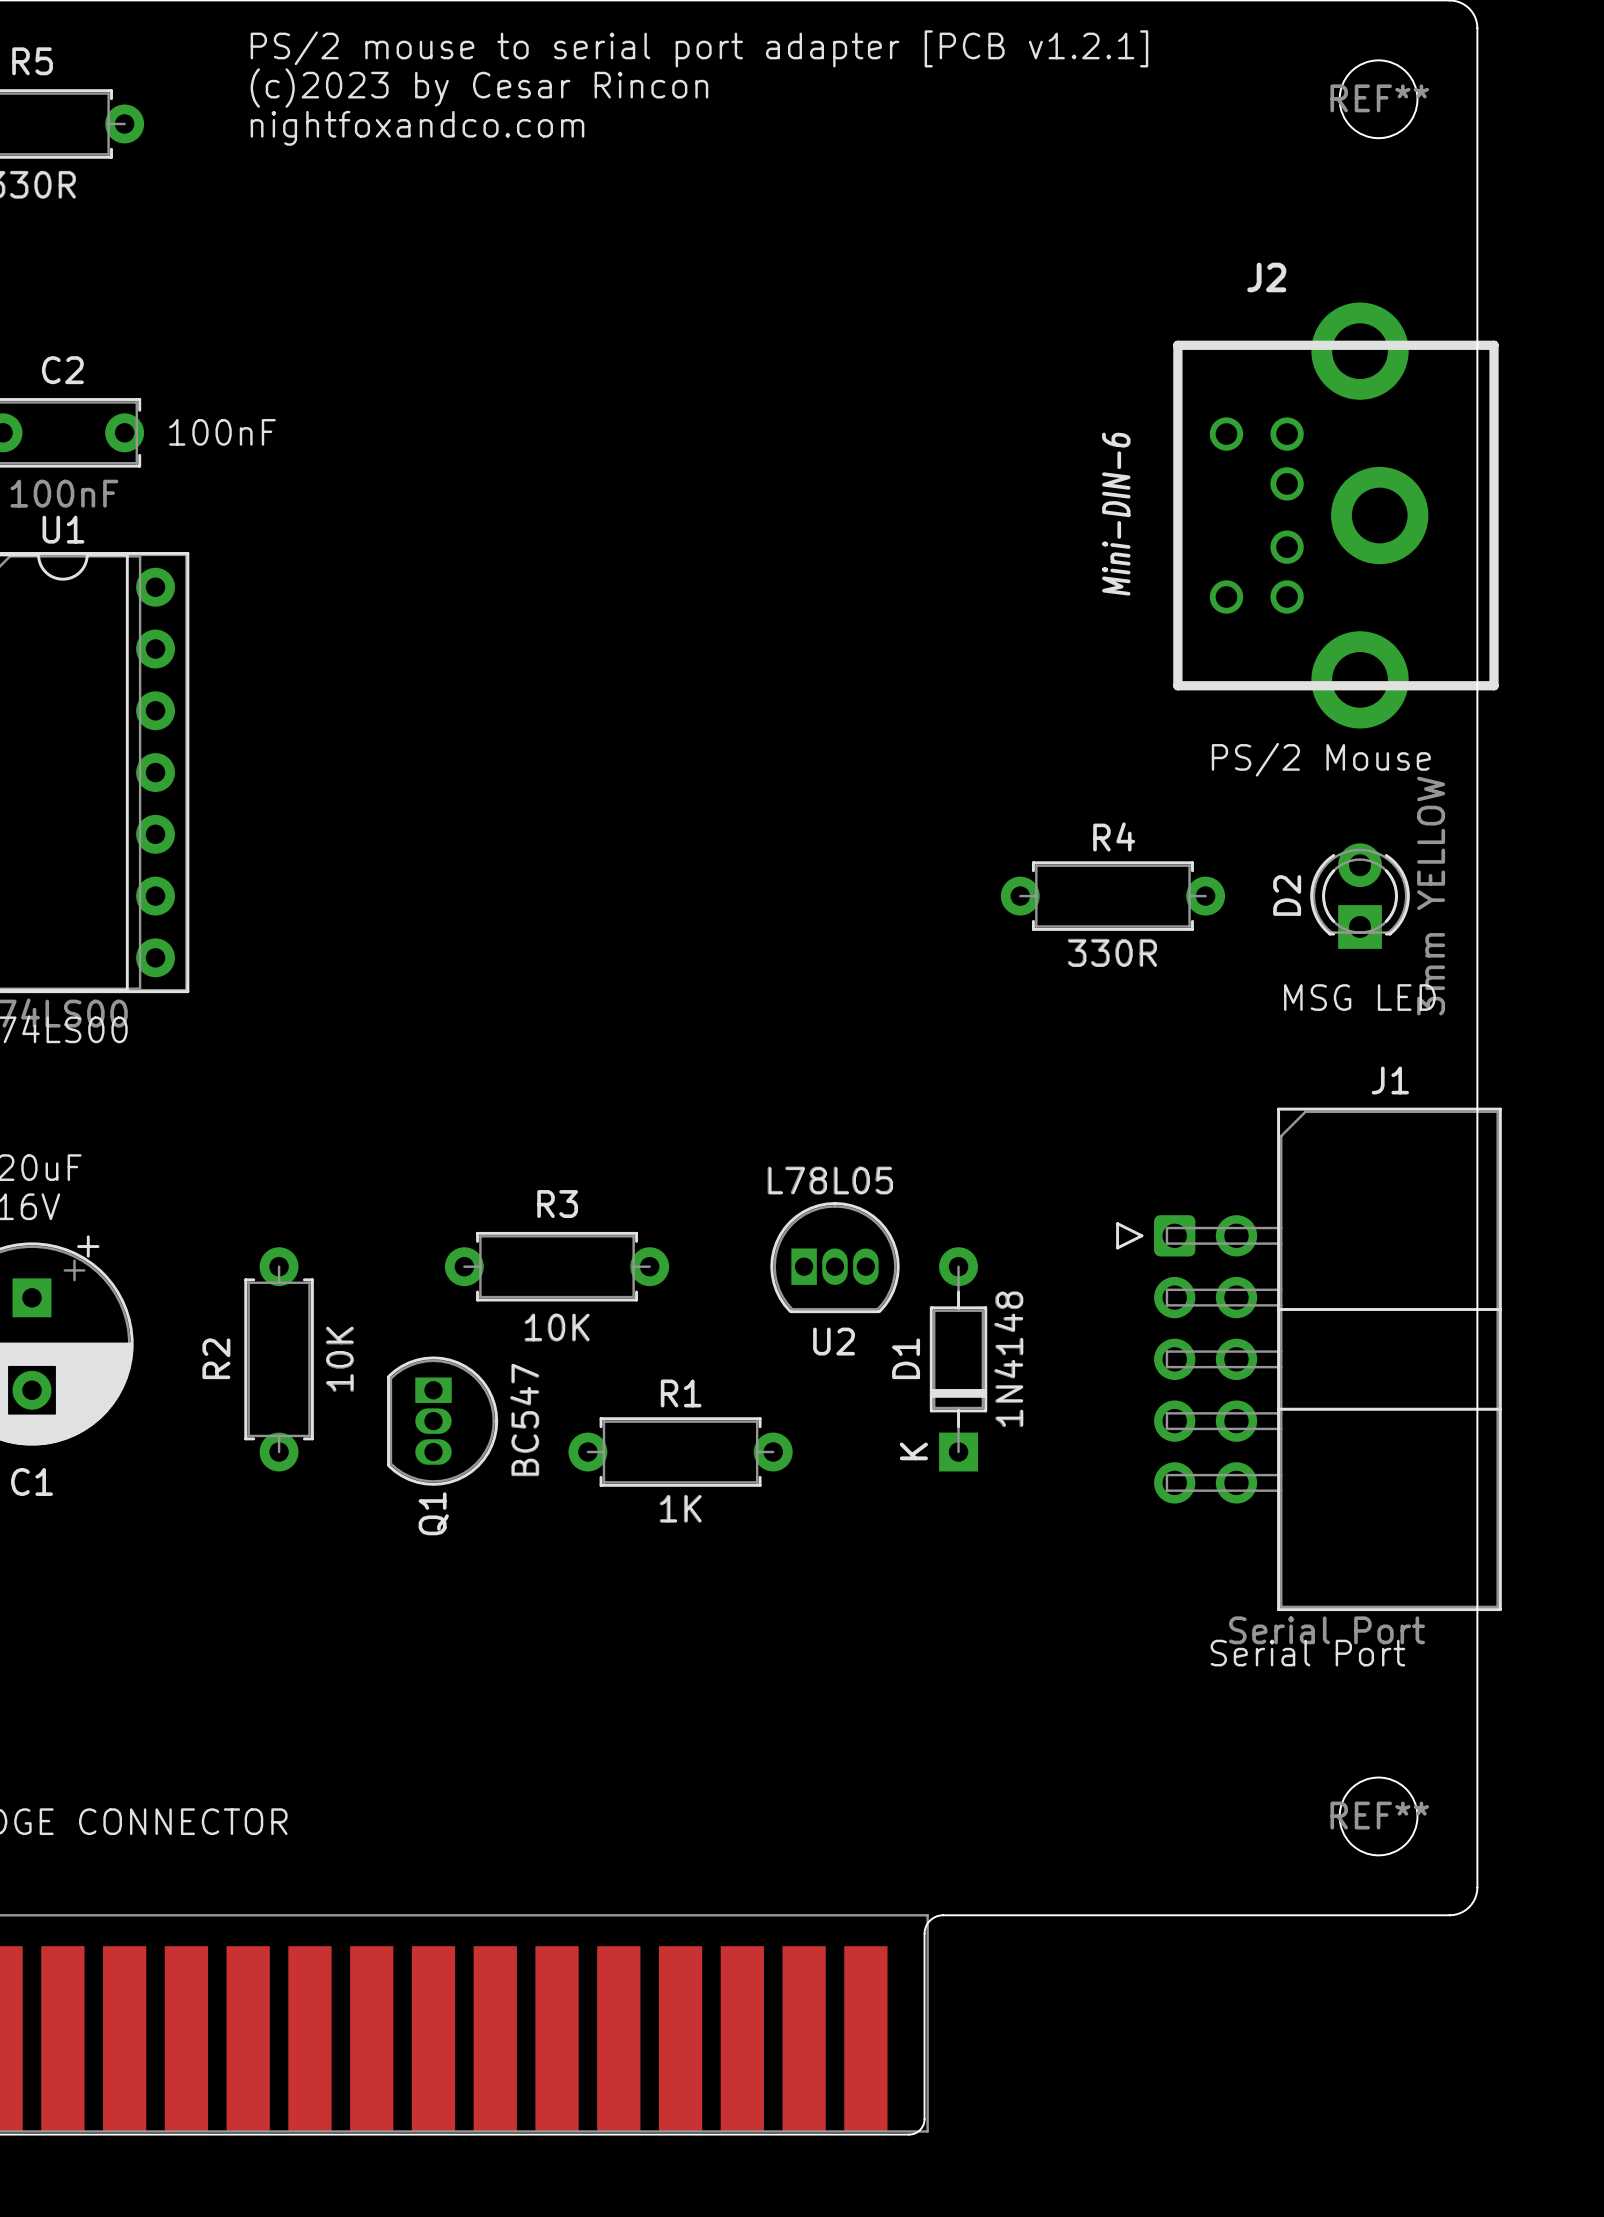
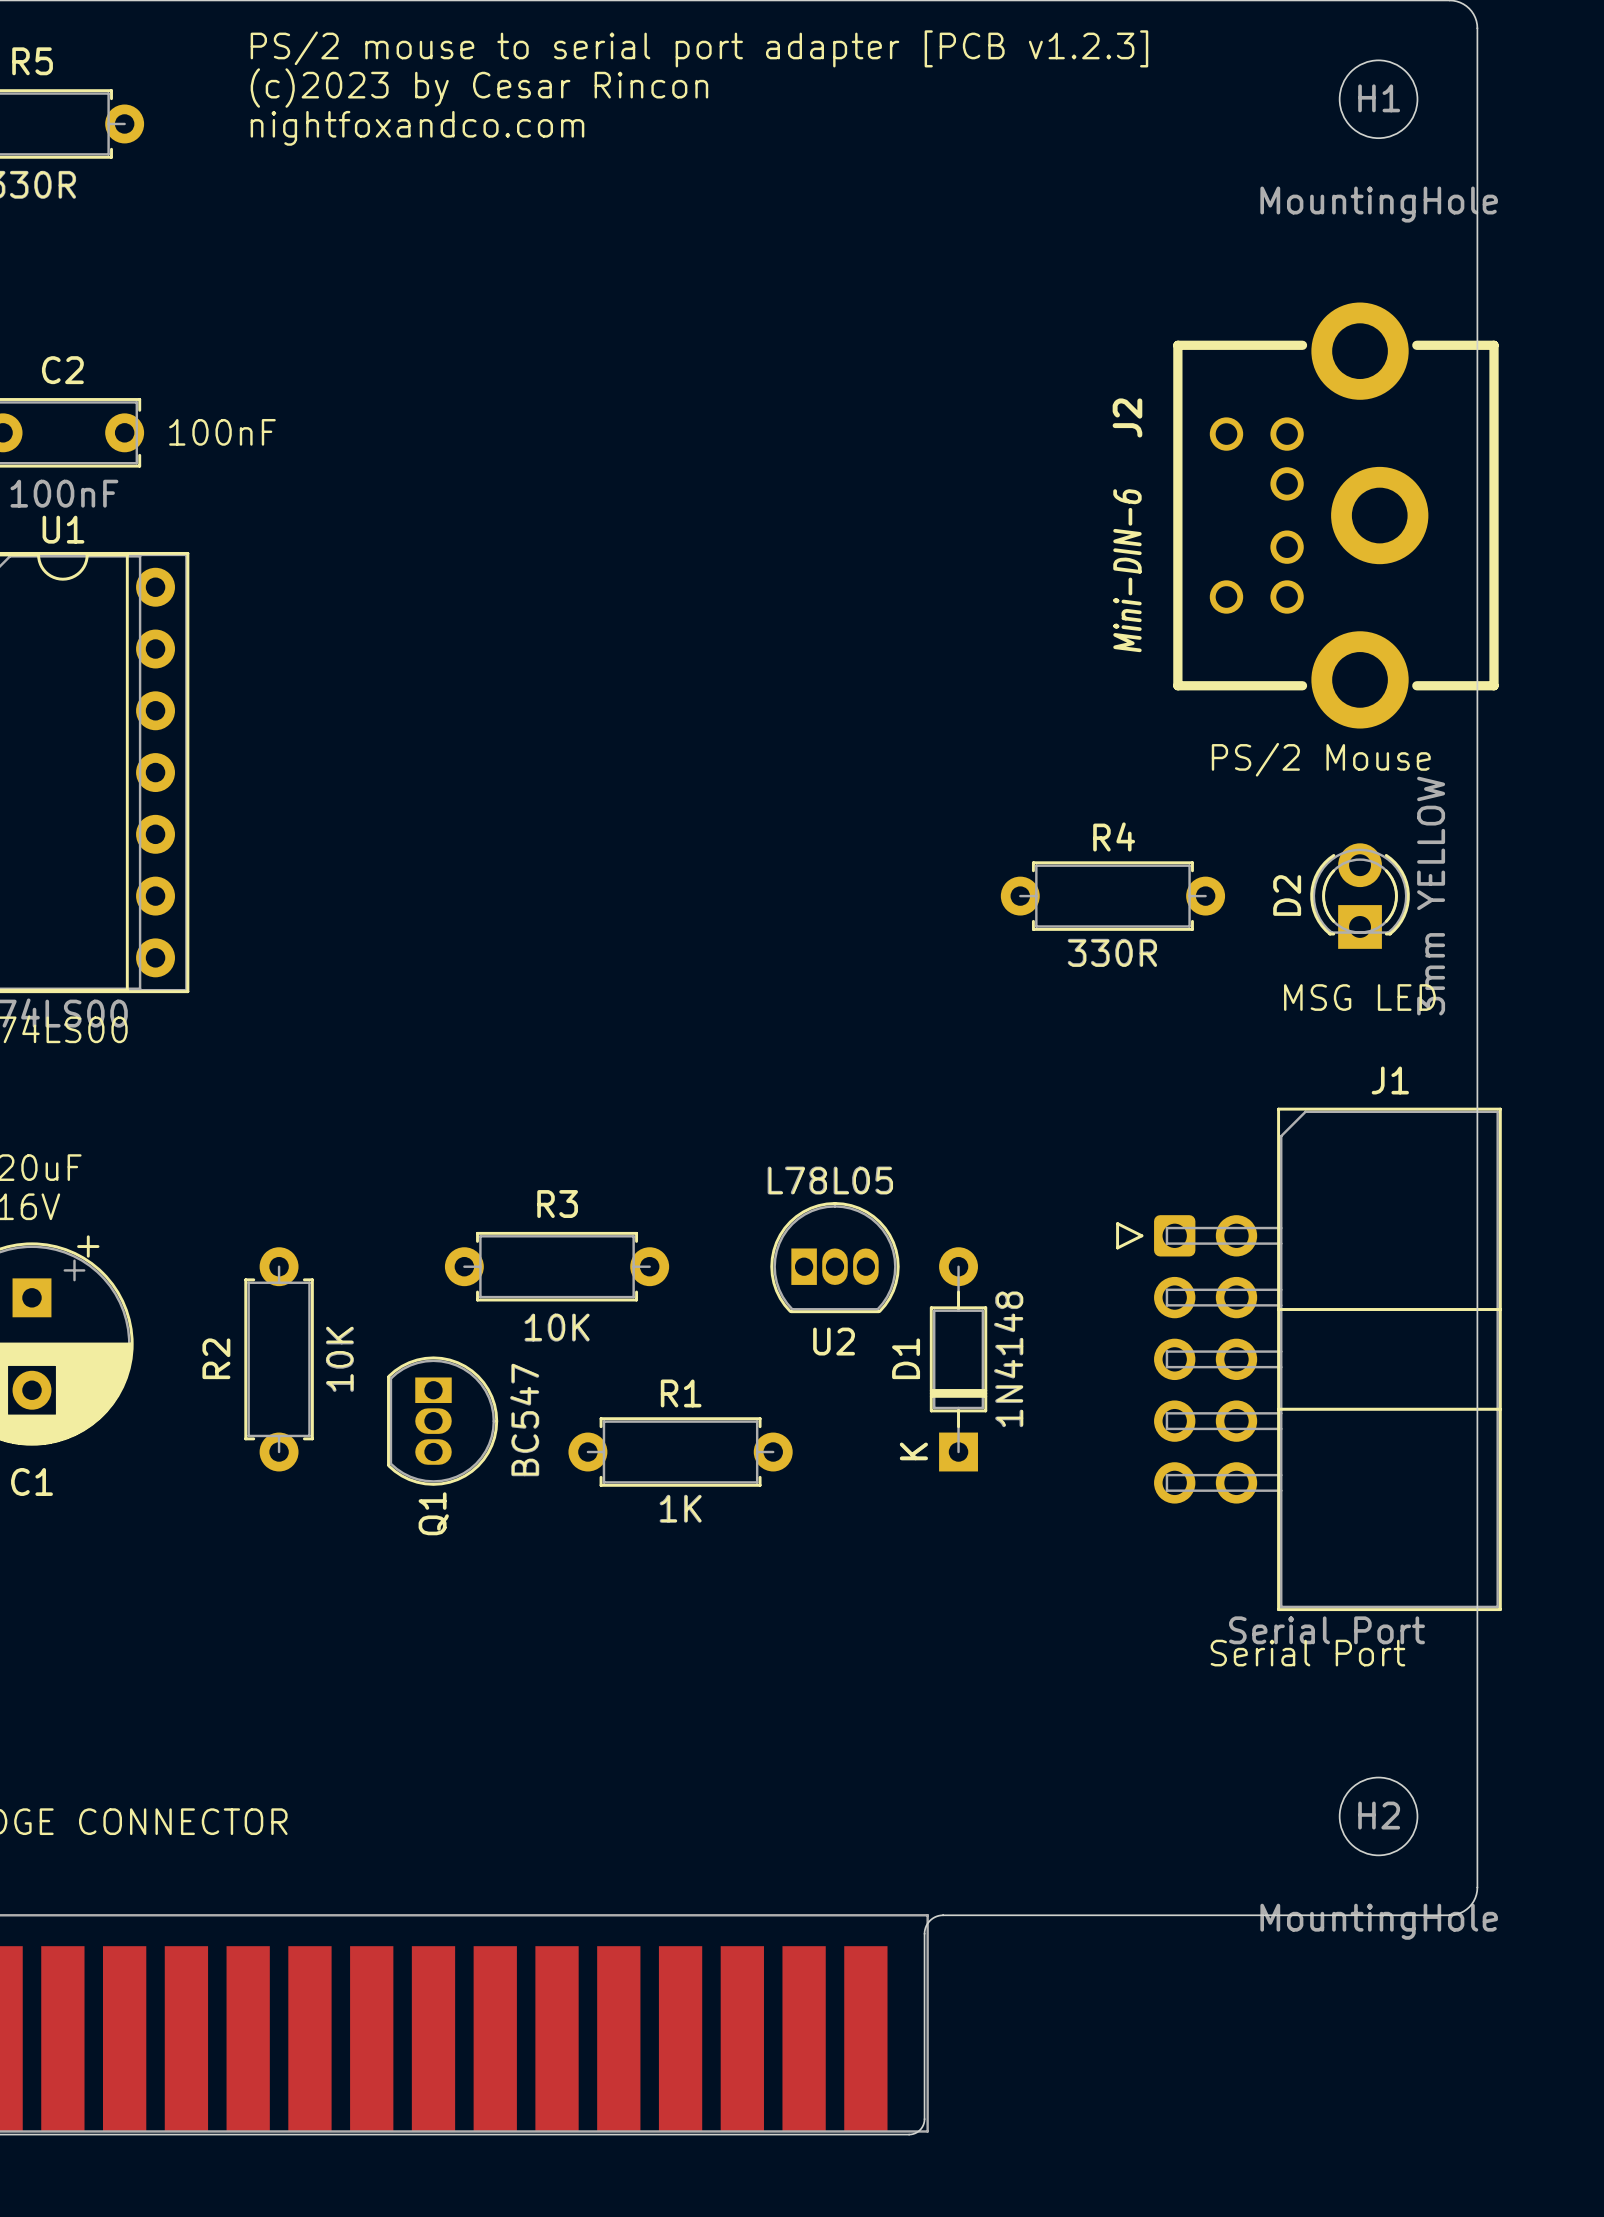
text: PS/2 mouse to serial port adapter [PCB v1.2.1] (699, 48) -> PS/2 mouse to serial port adapter [PCB v1.2.3] (699, 48)
REF** name: REF** (1379, 98) -> H1 (1379, 98)
REF** value: none -> MountingHole (1379, 204)
J2 name position: J2 (1266, 277) -> J2 (1127, 417)
J2 footprint: [1173, 302, 1499, 729] -> [1173, 302, 1499, 729]
J2 value position: Mini-DIN-6 (1116, 514) -> Mini-DIN-6 (1127, 570)
REF** name: REF** (1379, 1815) -> H2 (1379, 1815)
REF** value: none -> MountingHole (1379, 1921)

